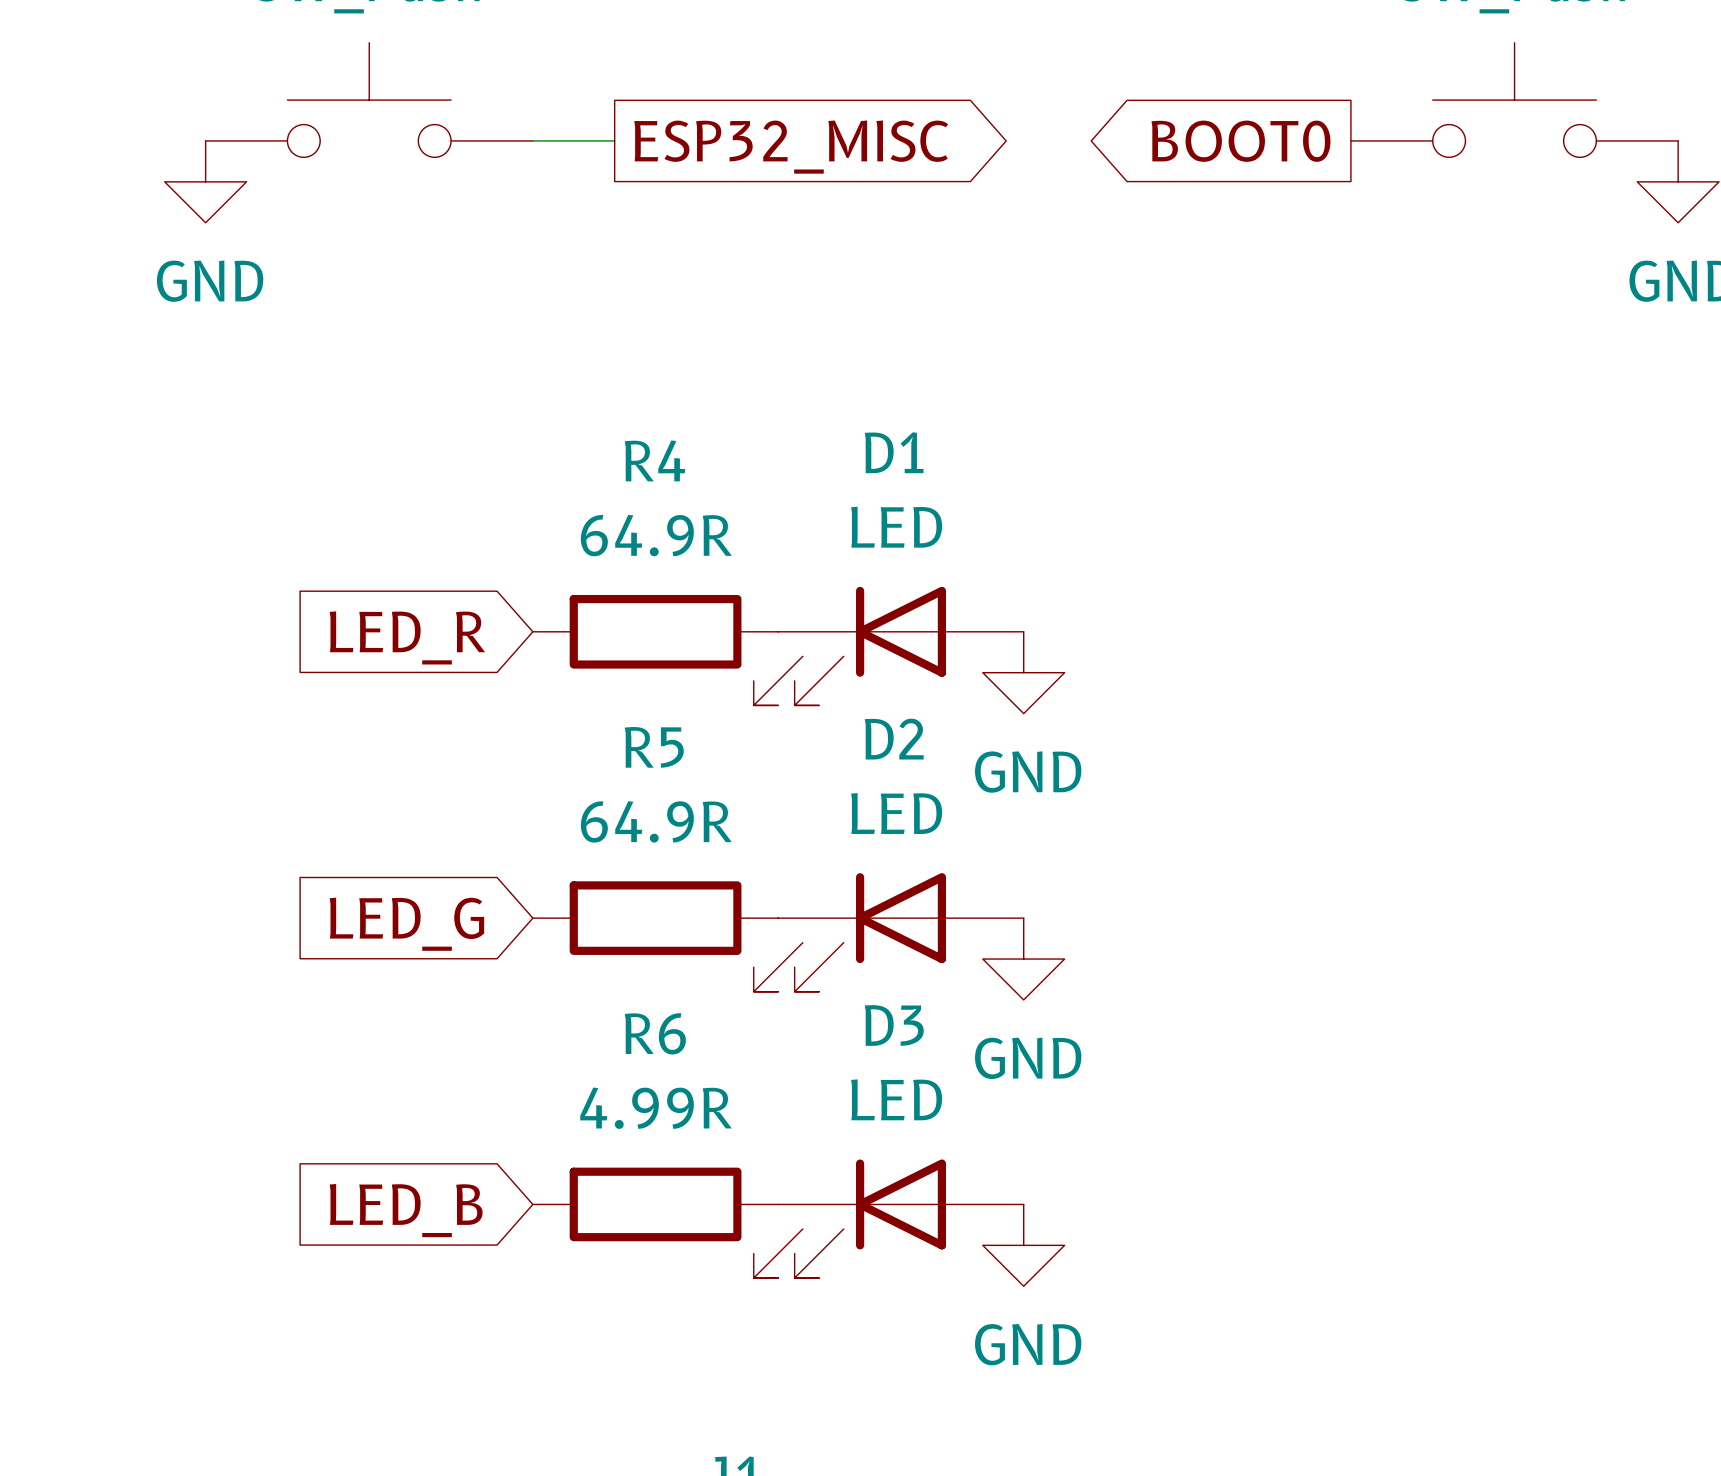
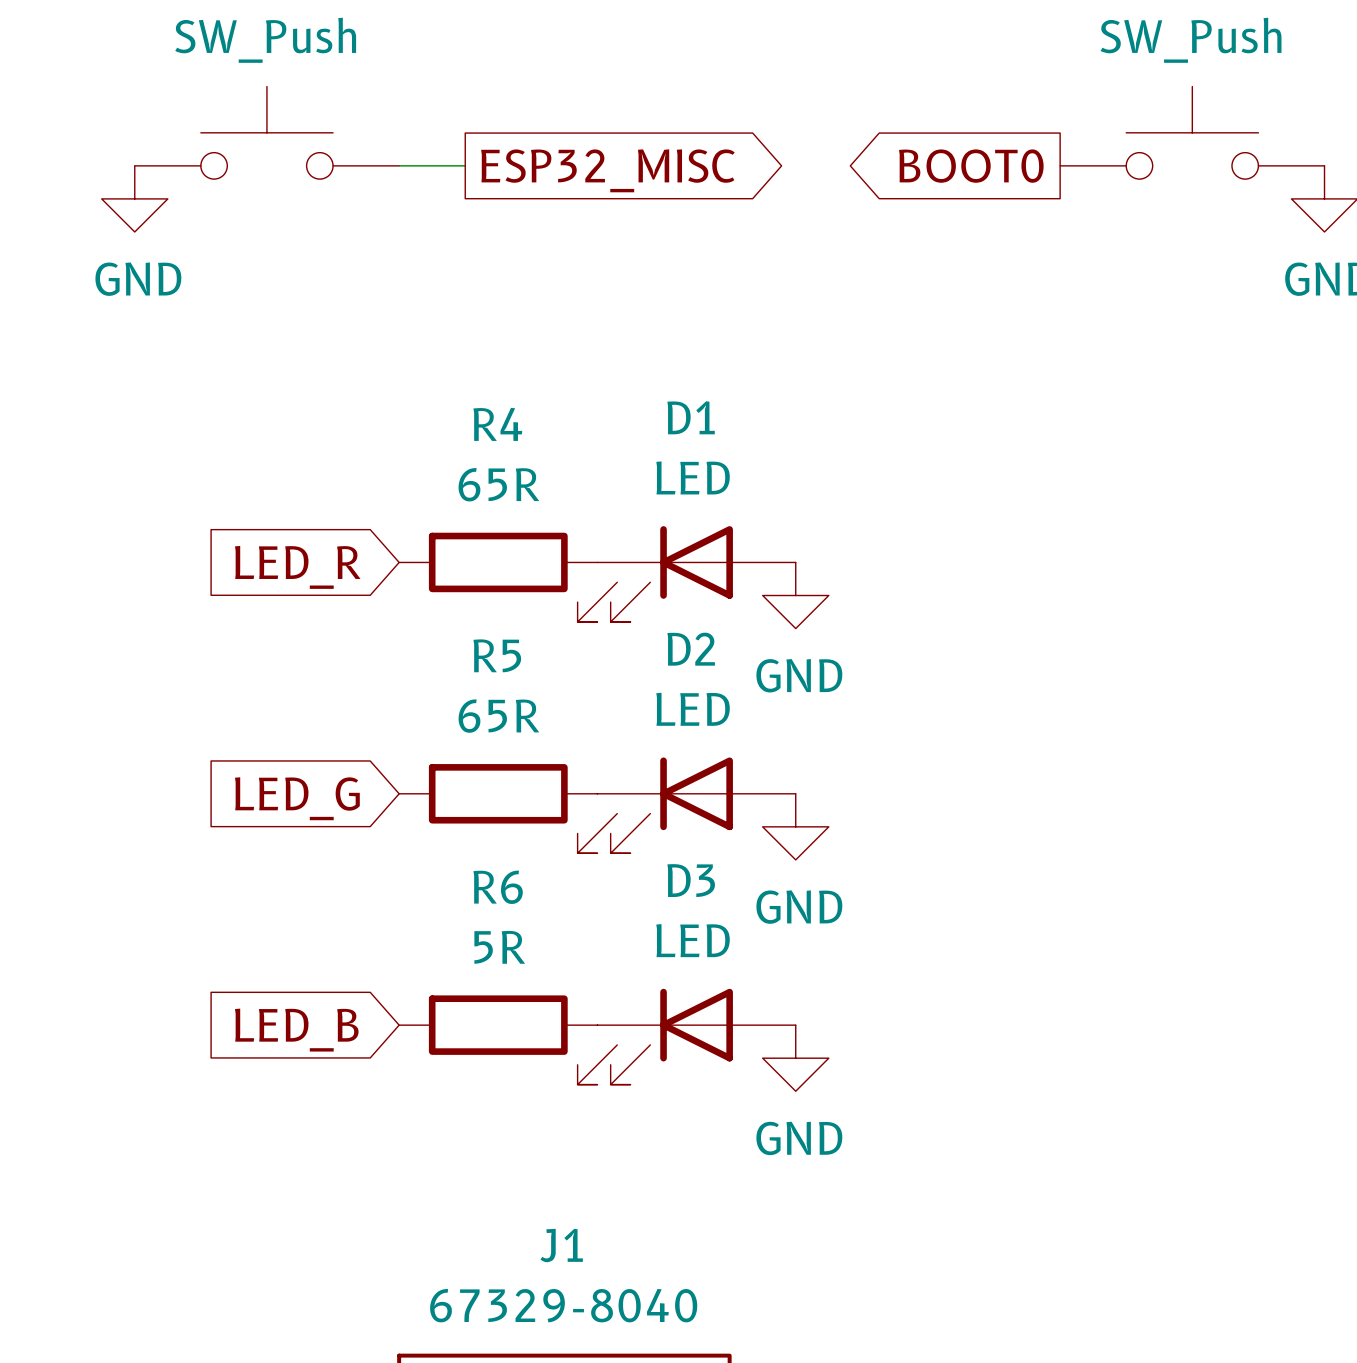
R4 value: 64.9R (656, 535) -> 65R (498, 484)
R5 value: 64.9R (656, 821) -> 65R (498, 716)
R6 value: 4.99R (656, 1108) -> 5R (499, 947)

